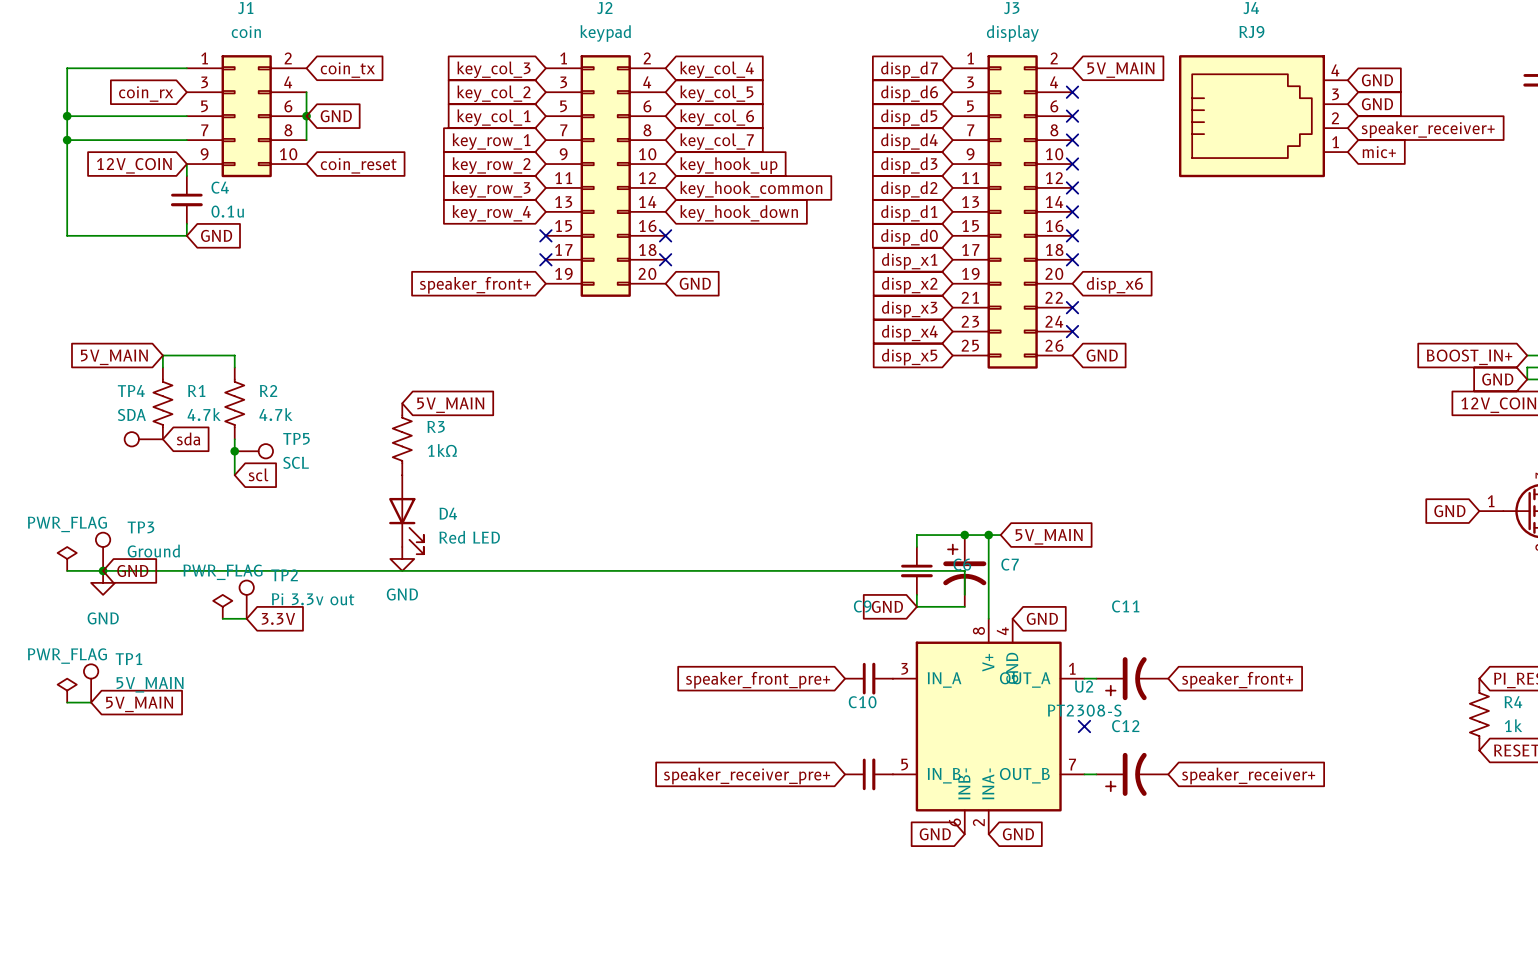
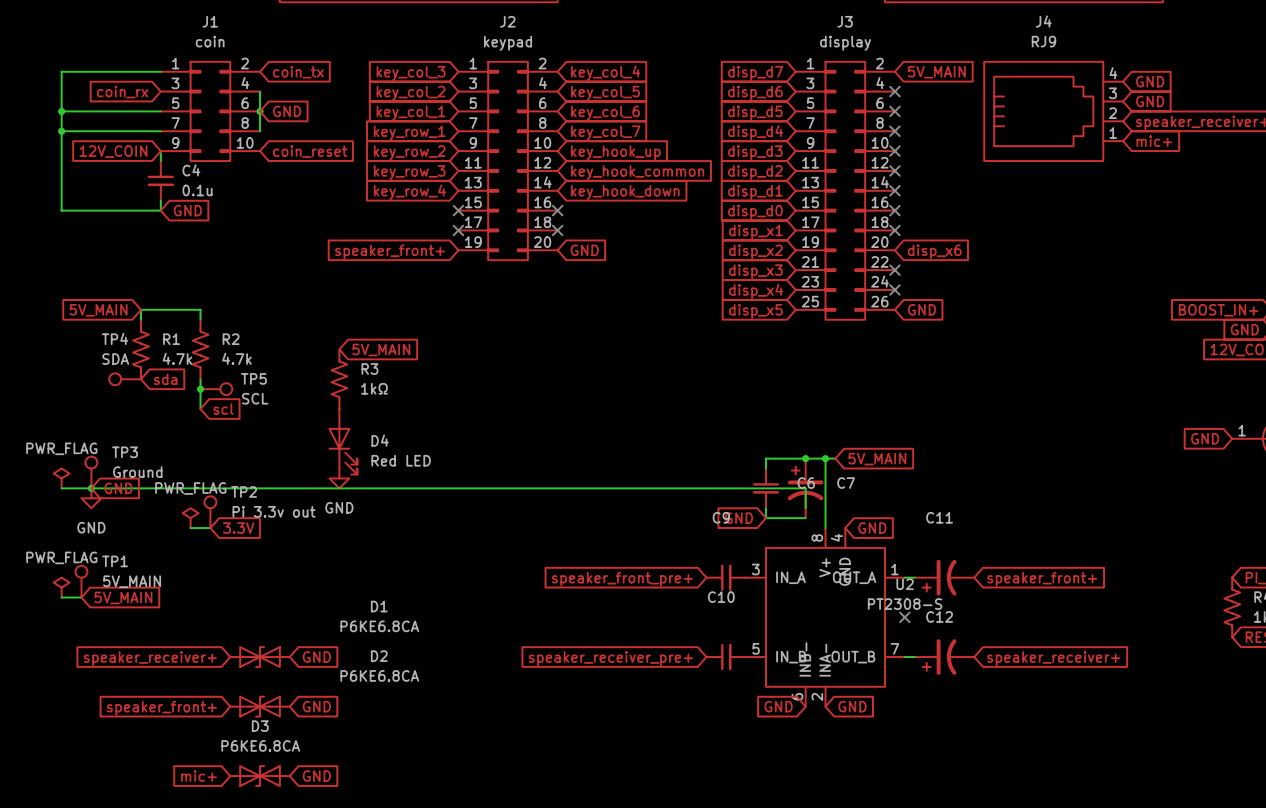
D1: none -> P6KE6.8CA (260, 657)
global label: none -> GND (316, 657)
global label: none -> speaker_receiver+ (150, 658)
D2: none -> P6KE6.8CA (260, 706)
global label: none -> GND (316, 706)
global label: none -> speaker_front+ (161, 708)
global label: none -> mic+ (198, 776)
D3: none -> P6KE6.8CA (260, 776)
global label: none -> GND (316, 776)

